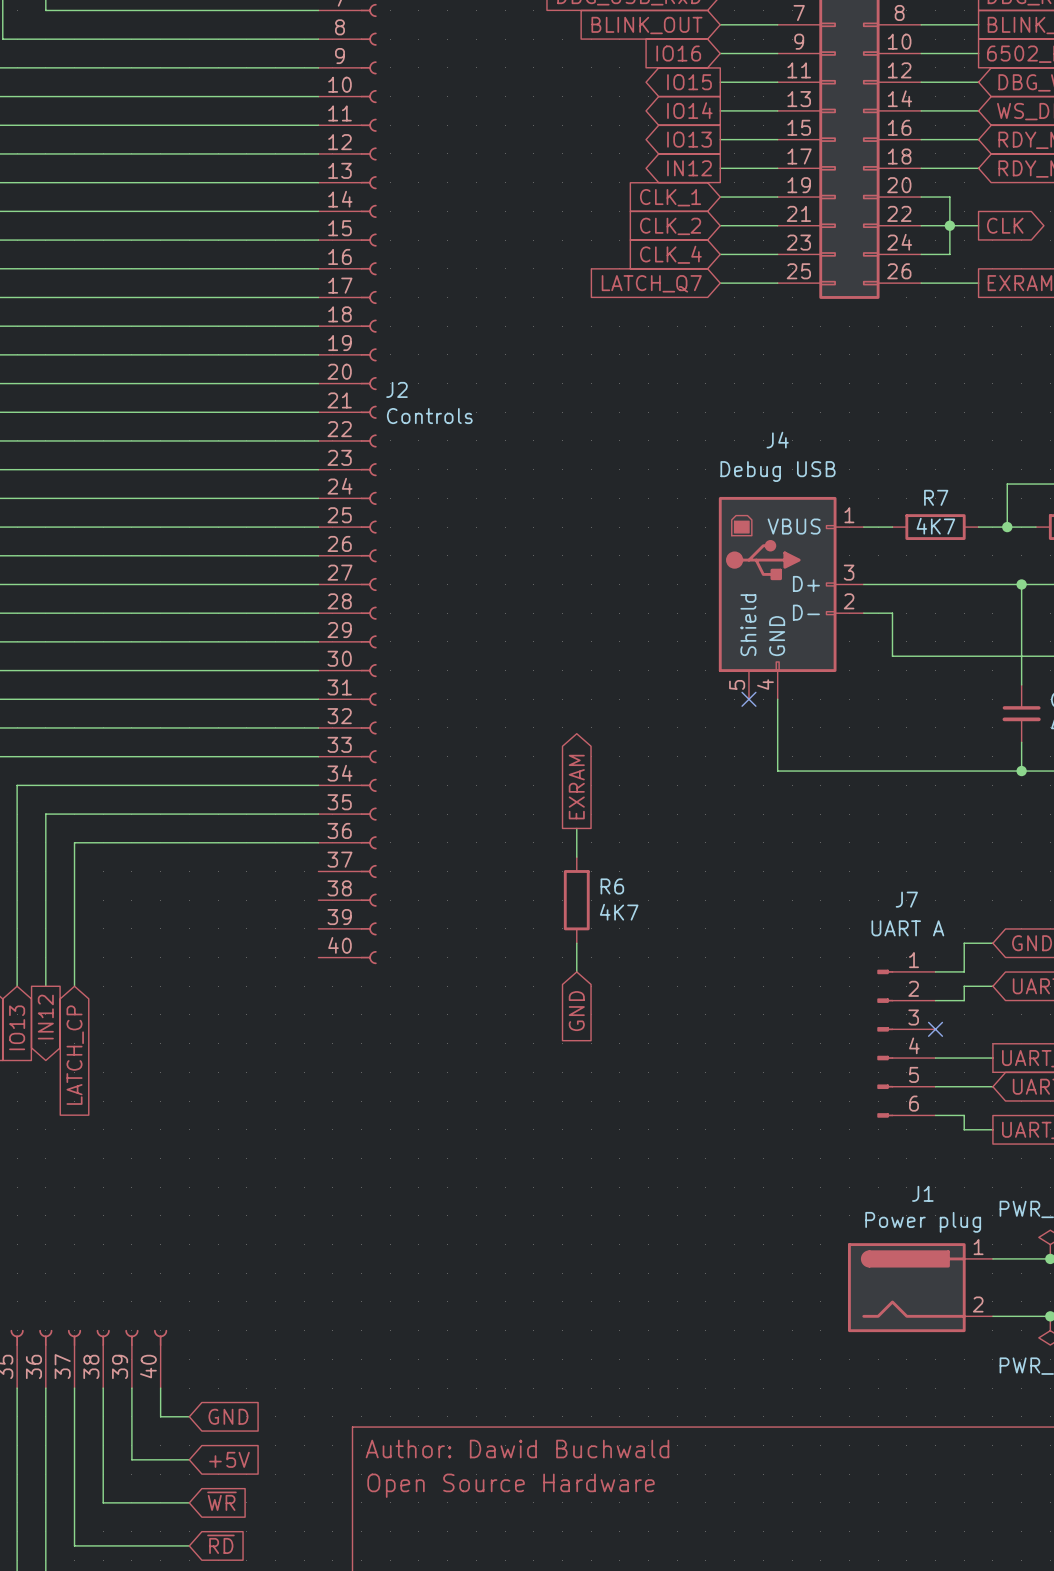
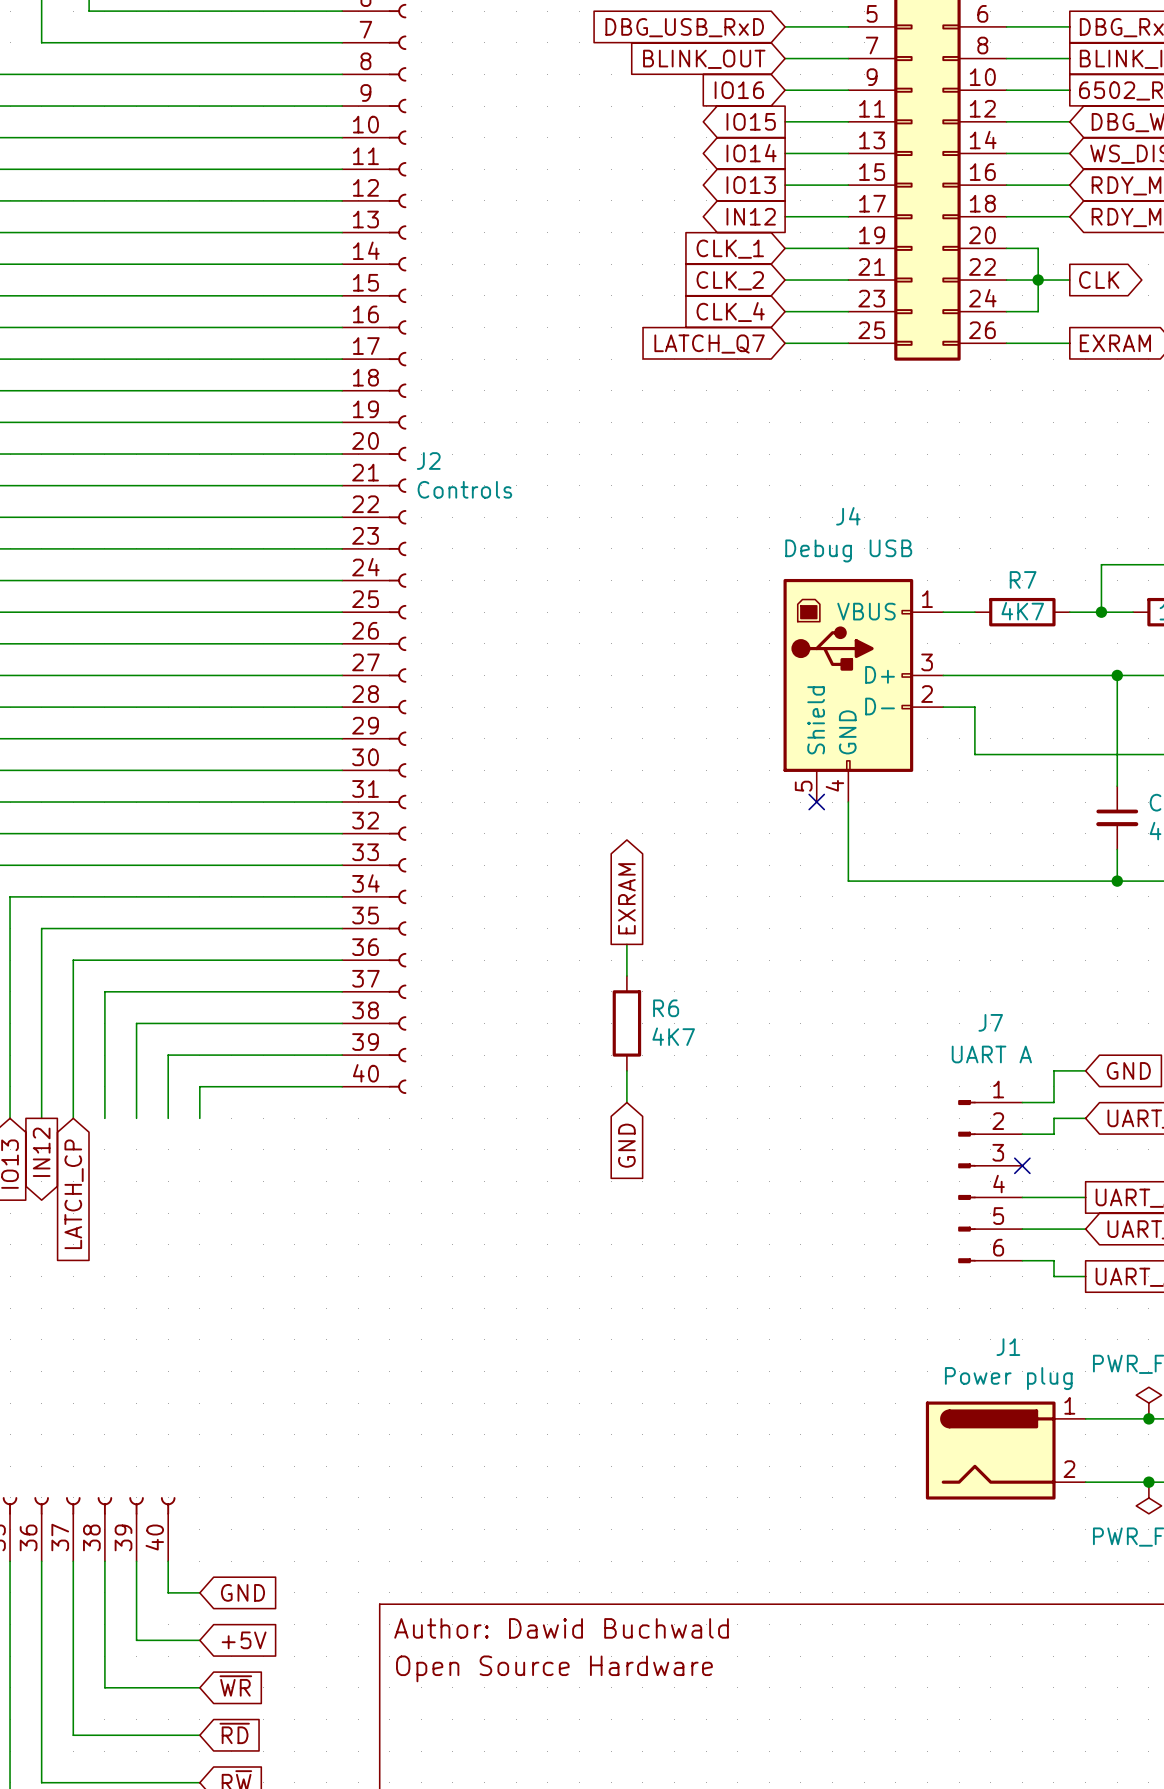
wire: none -> (342, 991) (104, 991) (104, 1118)
wire: none -> (342, 1023) (136, 1023) (136, 1118)
wire: none -> (342, 1055) (168, 1055) (168, 1118)
wire: none -> (342, 1086) (199, 1086) (199, 1118)

